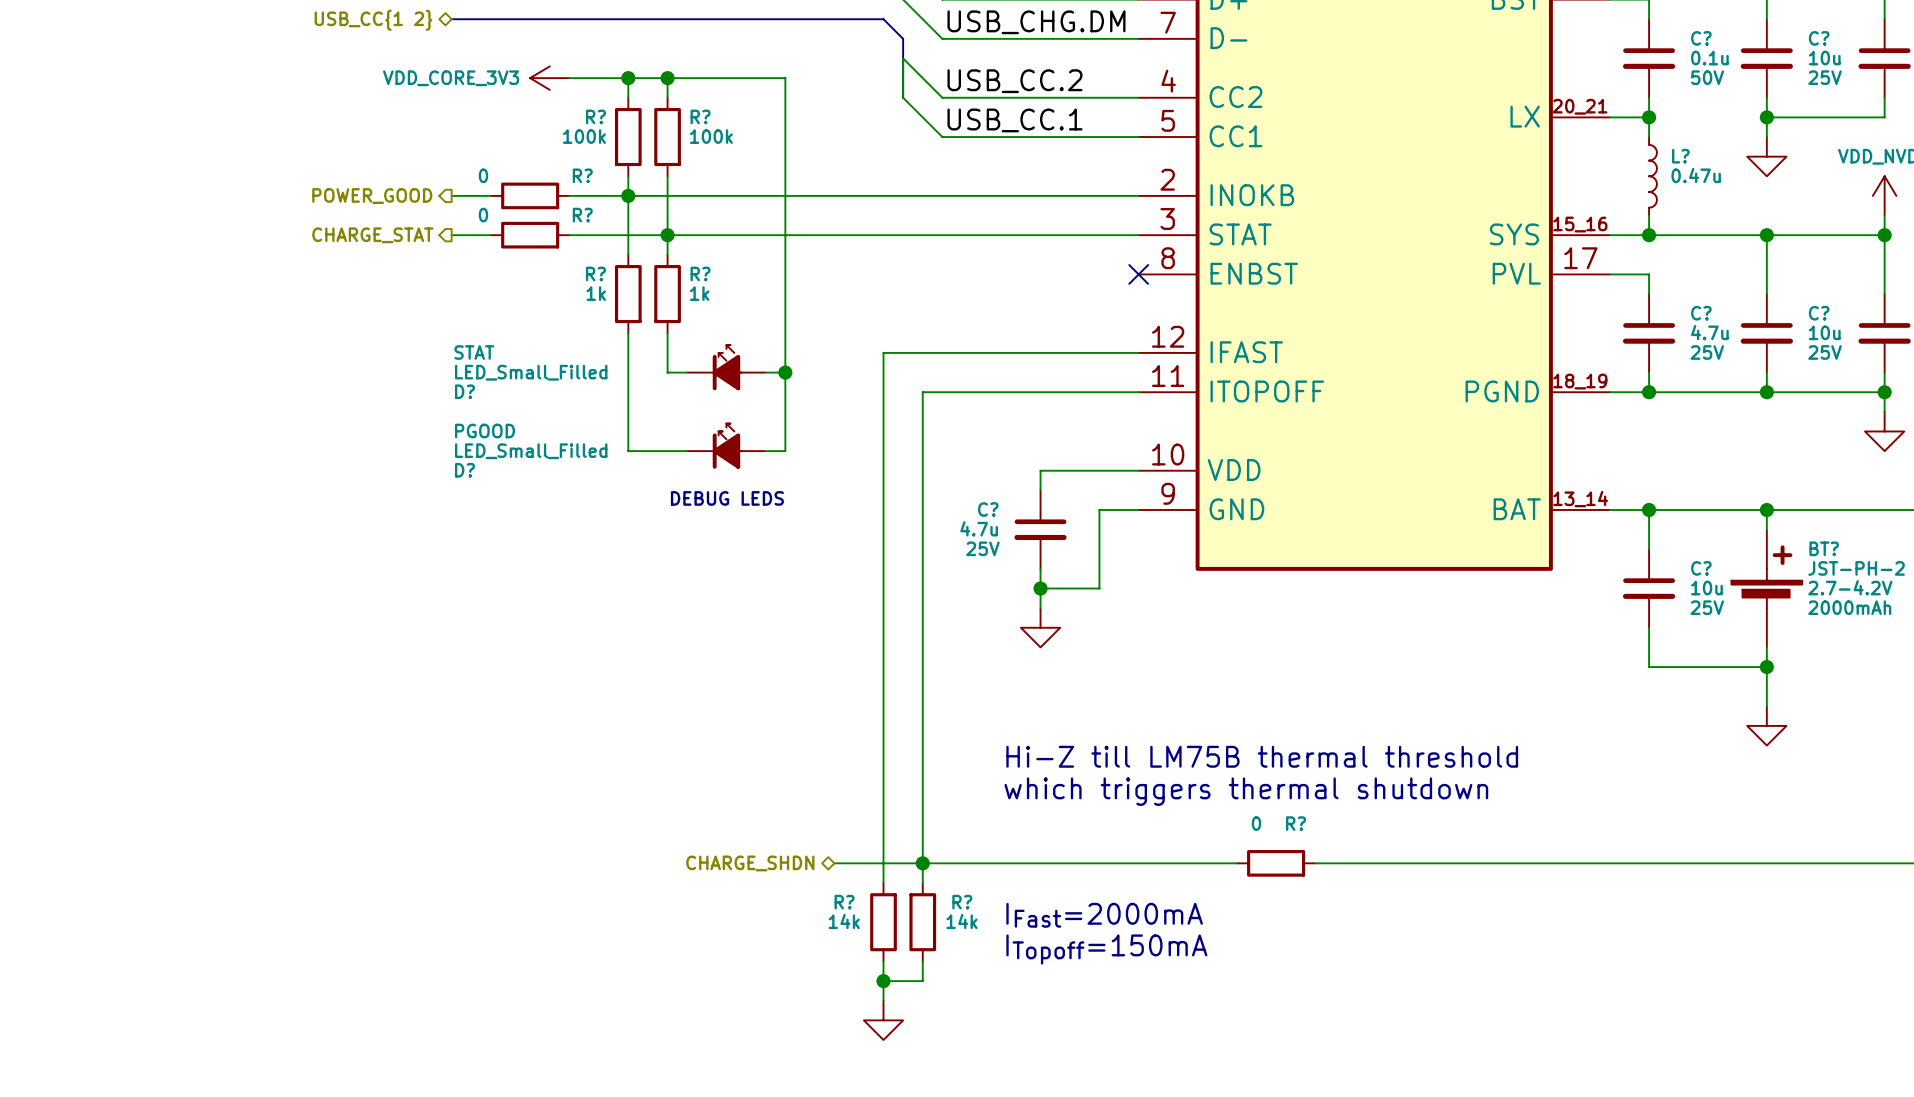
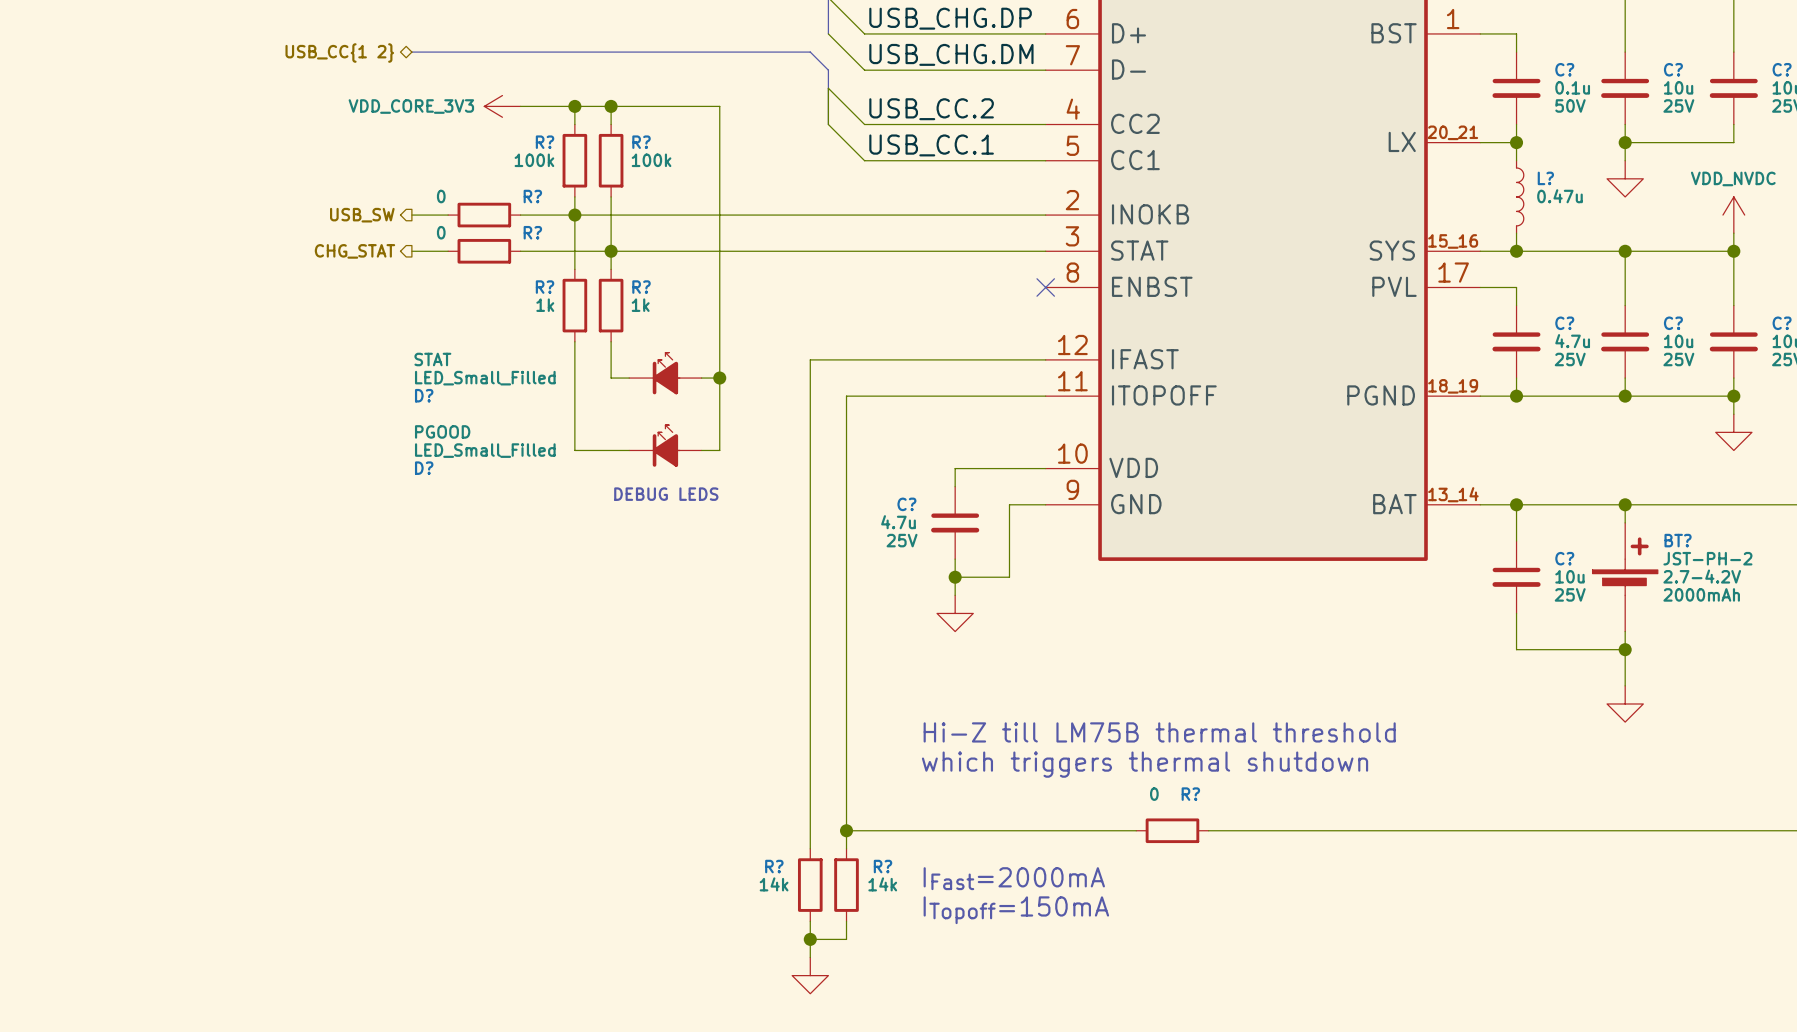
hierarchical label: POWER_GOOD (372, 196) -> USB_SW (362, 215)
hierarchical label: CHARGE_STAT (372, 235) -> CHG_STAT (354, 251)
hierarchical label: CHARGE_SHDN (750, 863) -> none
wire: (834, 863) (922, 863) -> none

